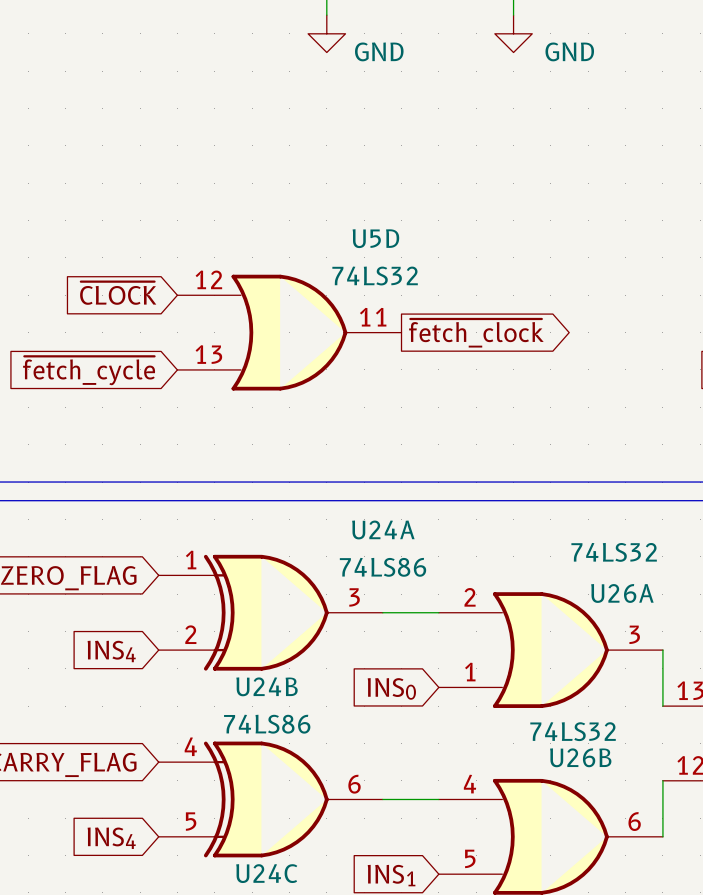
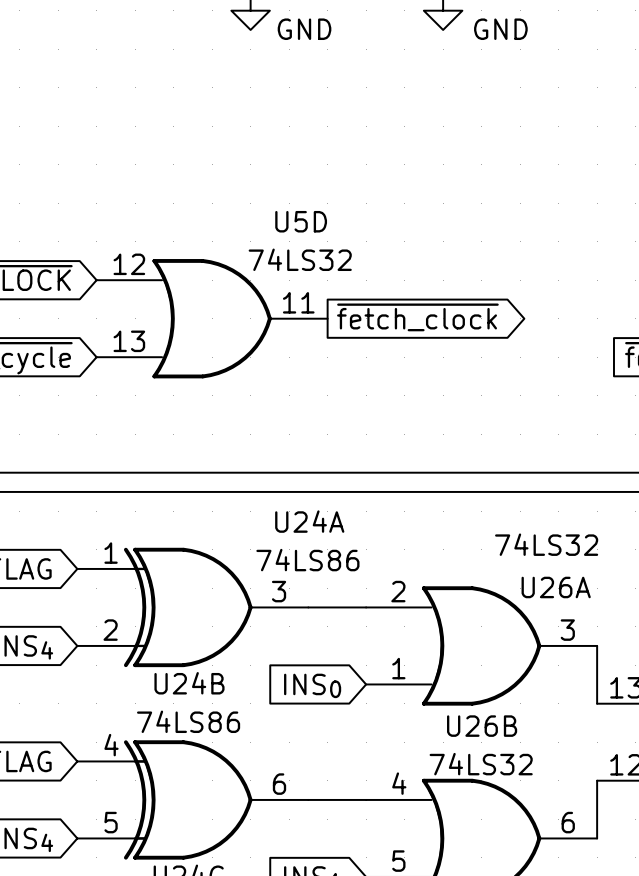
U26B value position: 74LS32 (573, 731) -> 74LS32 (481, 764)
U26B name position: U26B (580, 757) -> U26B (482, 726)

